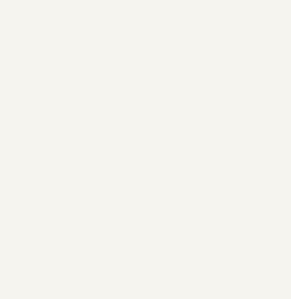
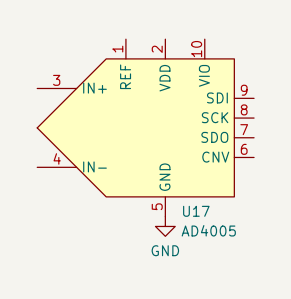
U17: none -> AD4005 (145, 127)
power symbol: none -> GND (165, 226)

